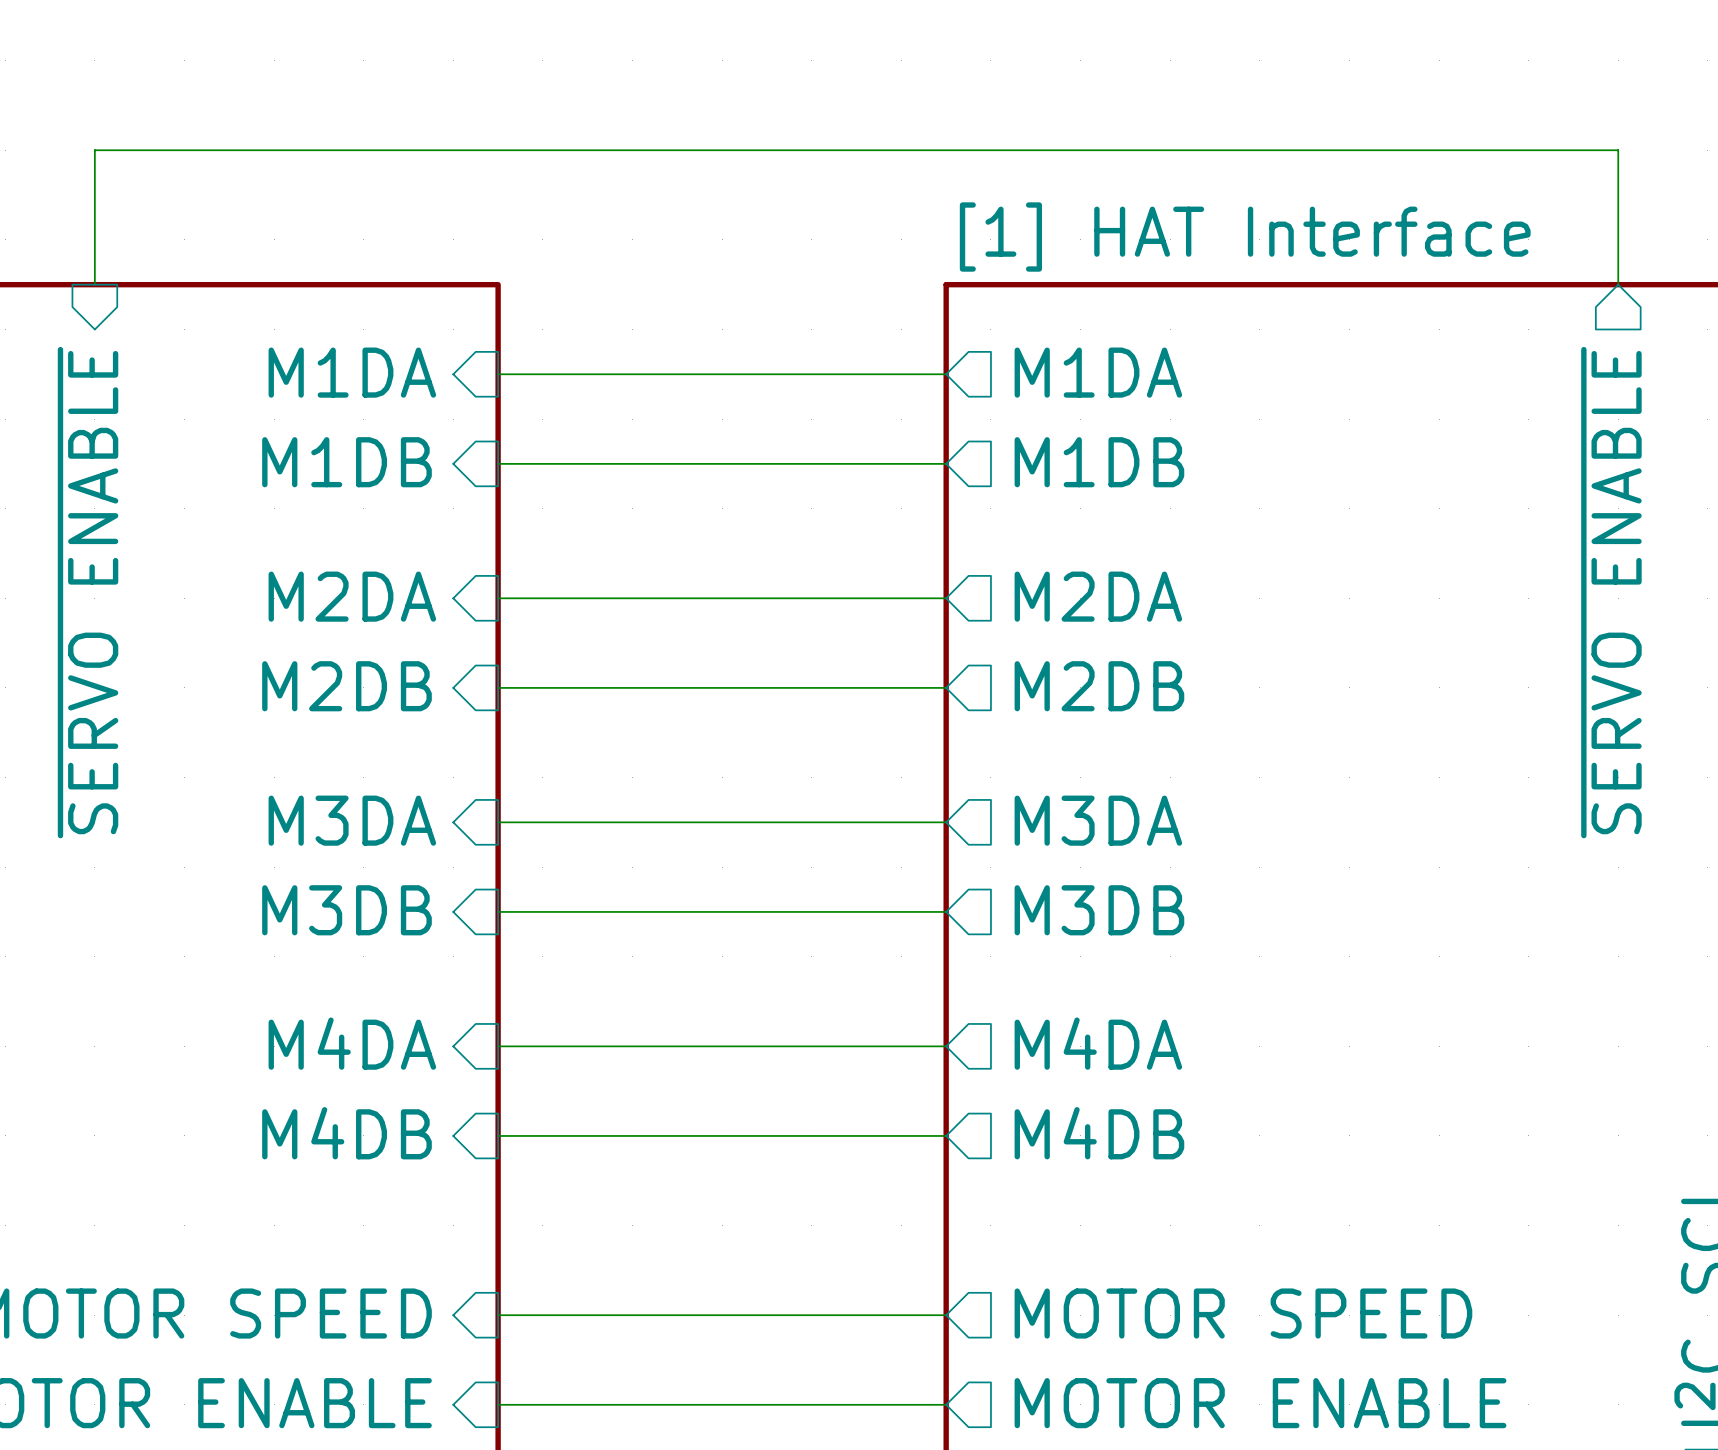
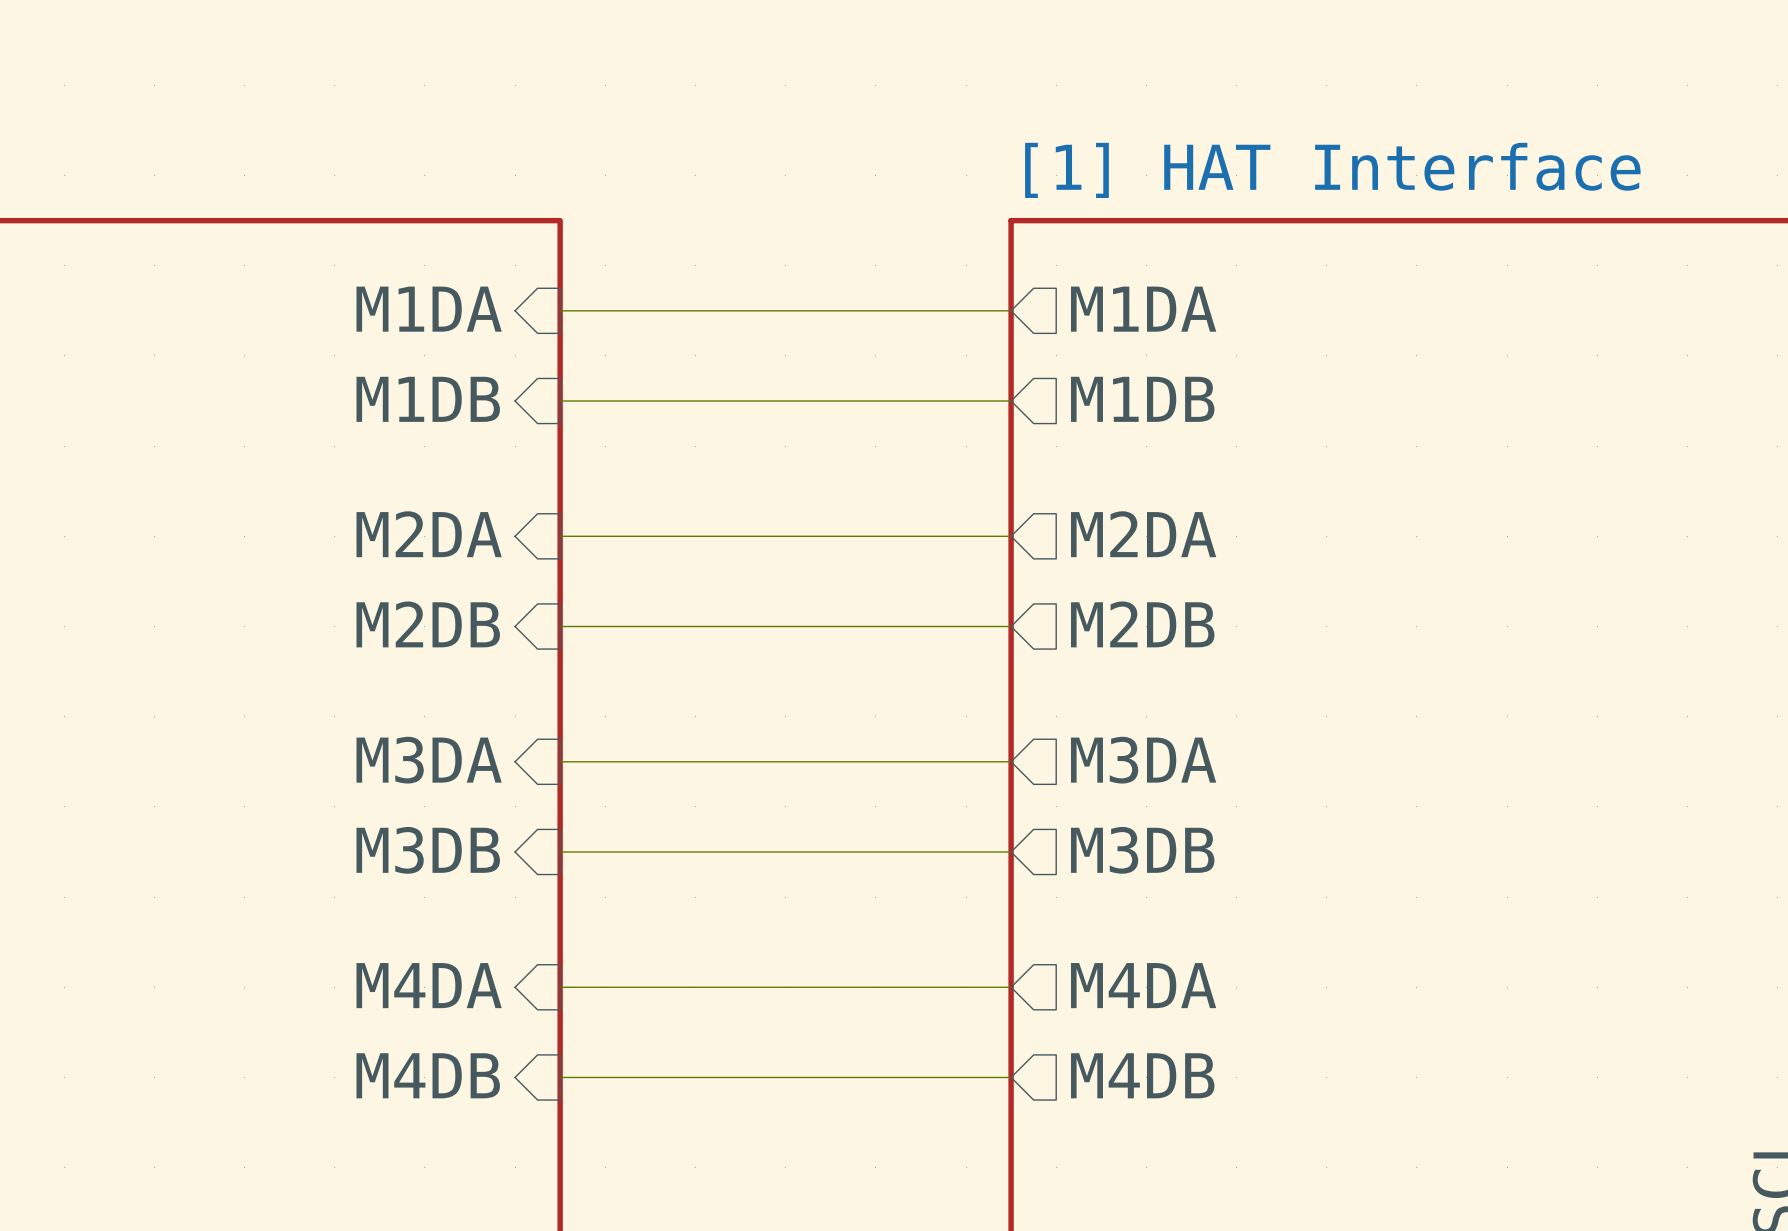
wire: (94, 284) (94, 150) (1618, 150) (1618, 284) -> none
sheet pin: ~{SERVO ENABLE} (88, 592) -> none
sheet pin: ~{SERVO ENABLE} (1611, 592) -> none

